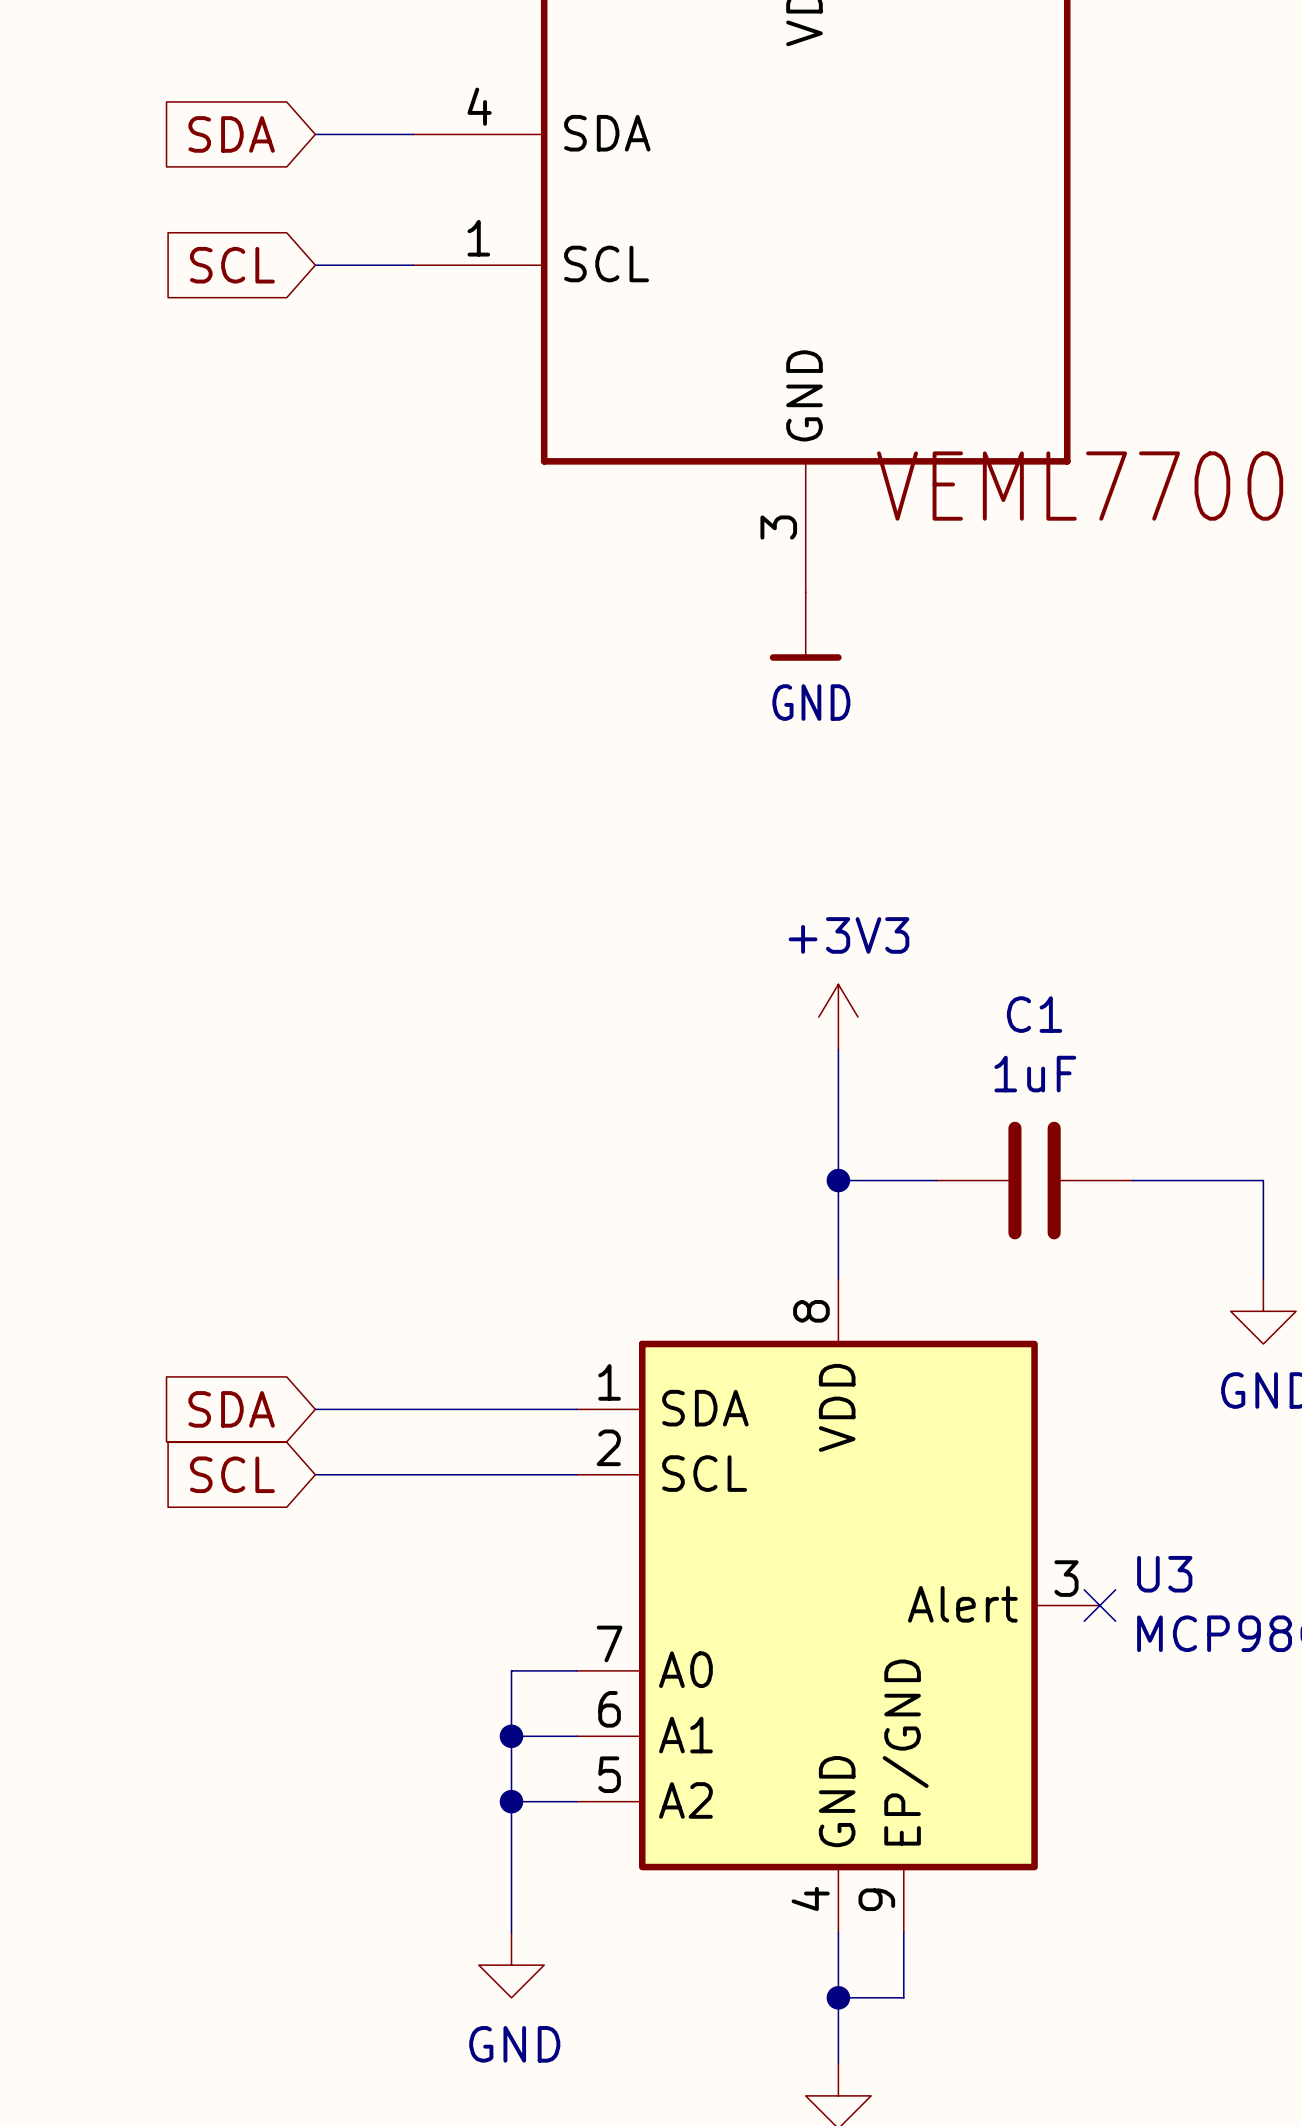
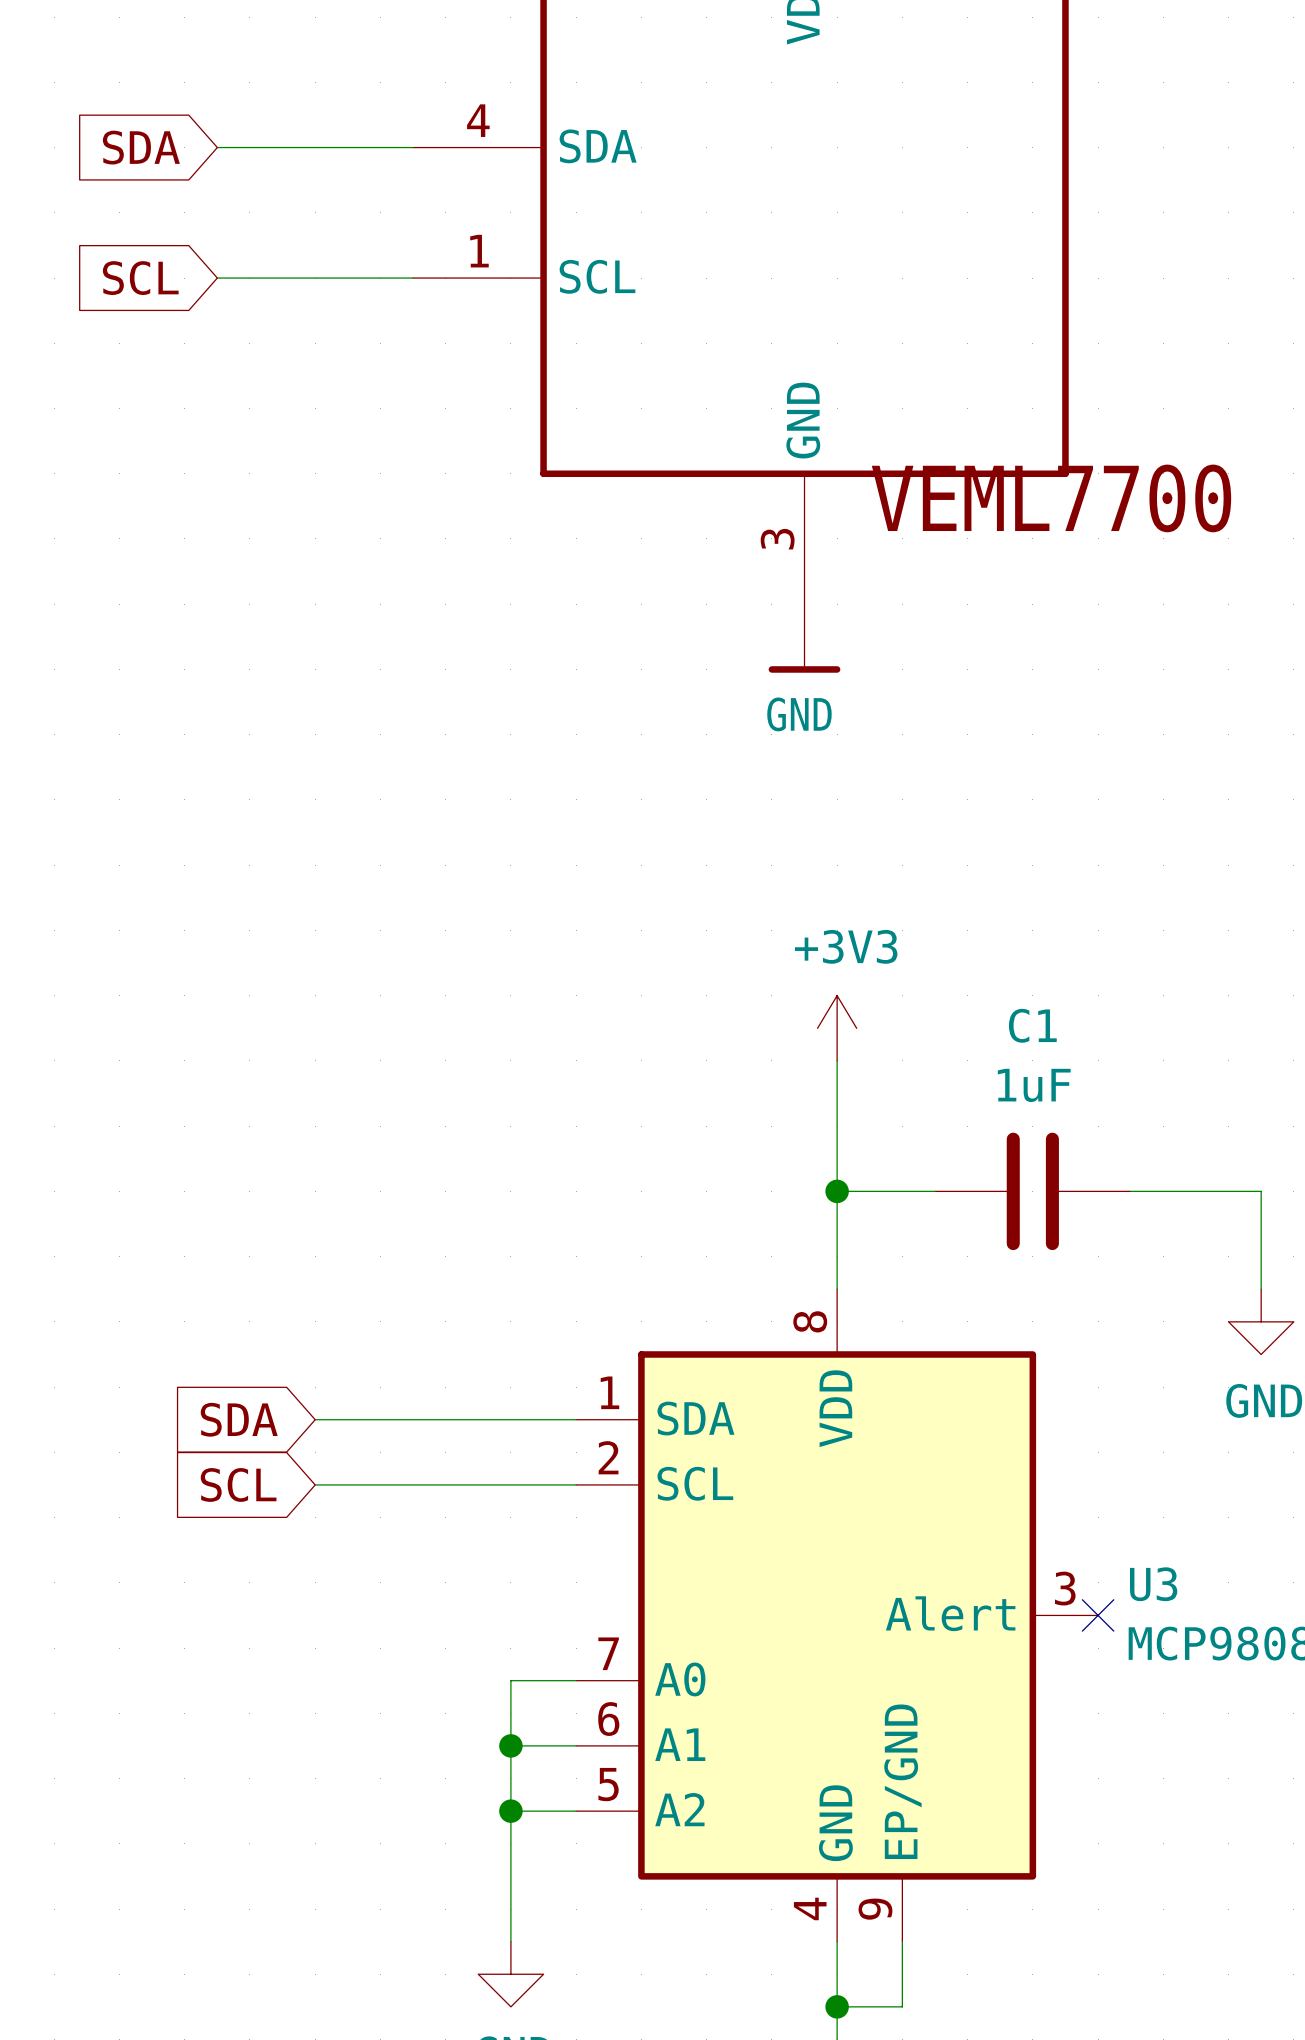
wire: none -> (217, 147) (315, 147)
global label position: SDA (231, 134) -> SDA (141, 147)
wire: none -> (217, 278) (315, 278)
global label position: SCL (232, 265) -> SCL (140, 278)

